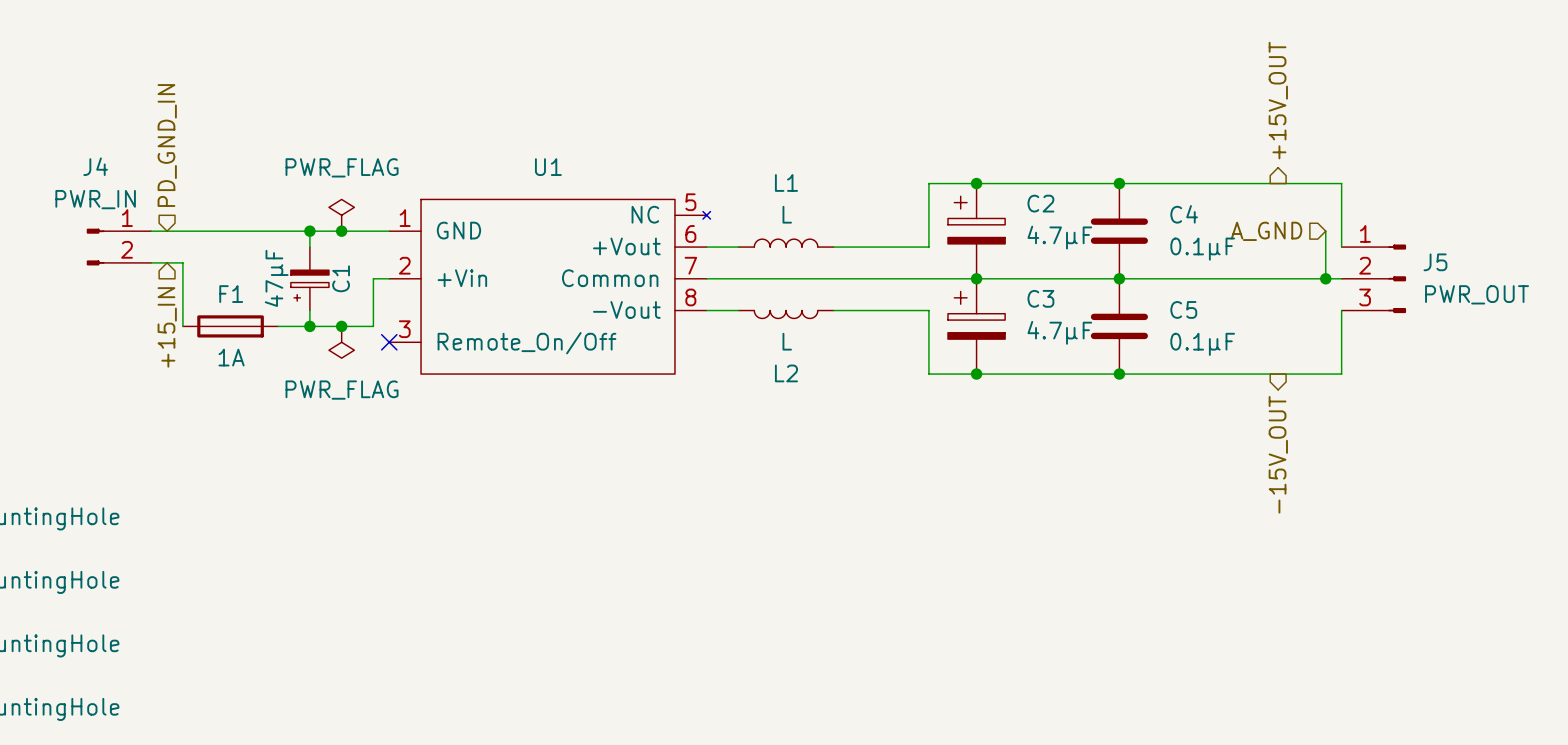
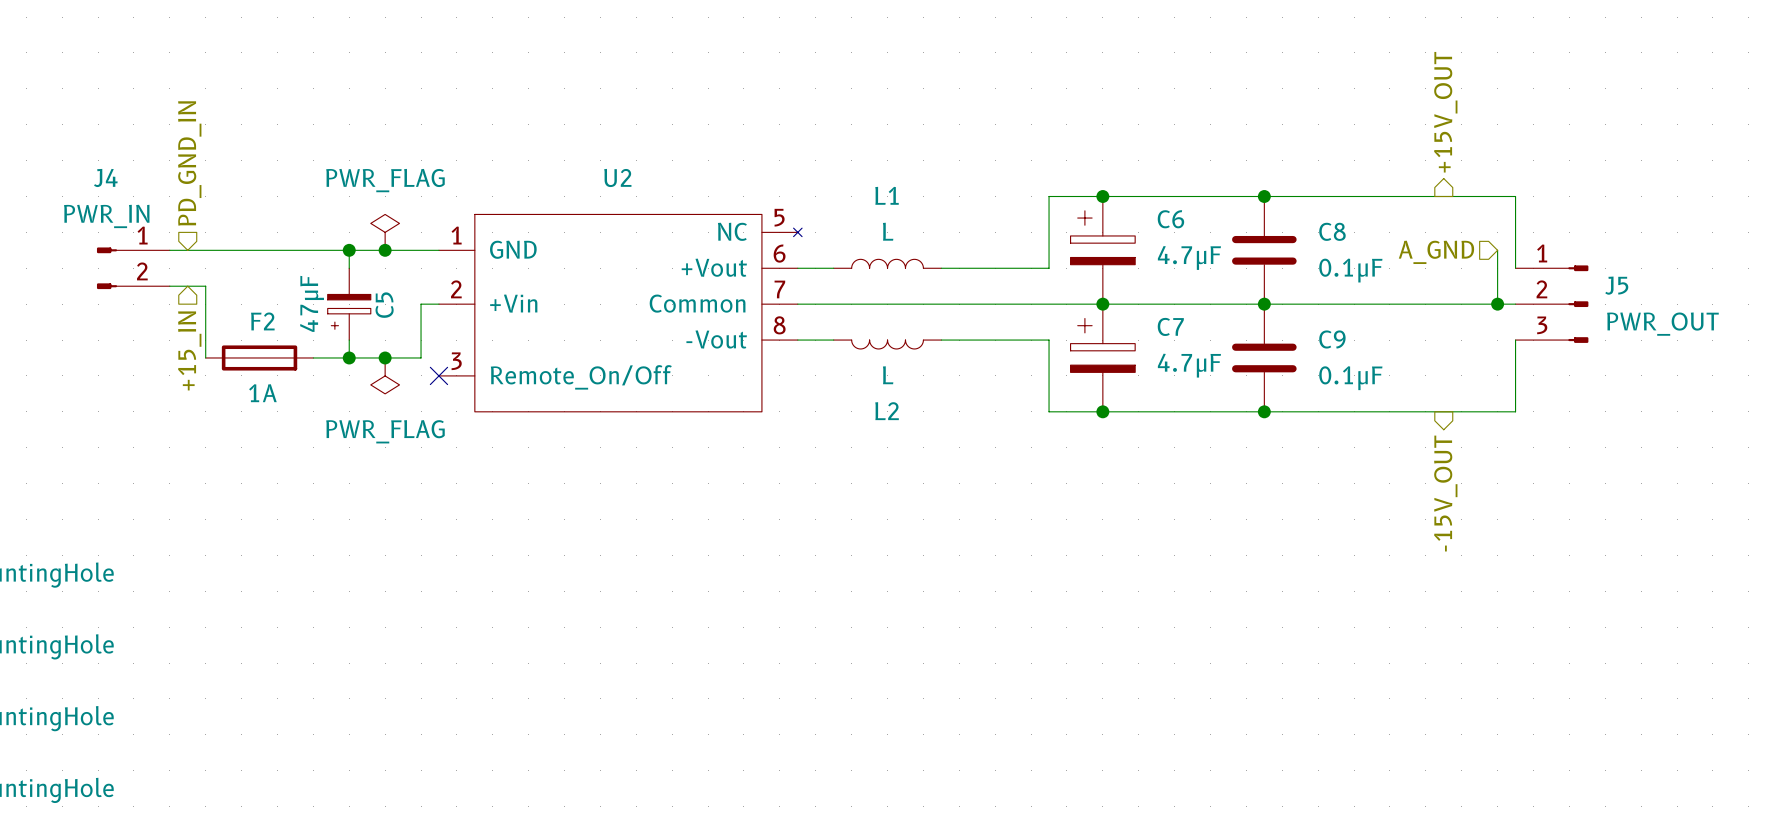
U1 name: U1 (548, 167) -> U2 (617, 177)
C2 name: C2 (1040, 203) -> C6 (1170, 219)
C4 name: C4 (1184, 214) -> C8 (1332, 231)
C1 name: C1 (341, 278) -> C5 (384, 305)
F1 name: F1 (231, 294) -> F2 (262, 321)
C3 name: C3 (1040, 298) -> C7 (1170, 326)
C5 name: C5 (1183, 309) -> C9 (1332, 339)

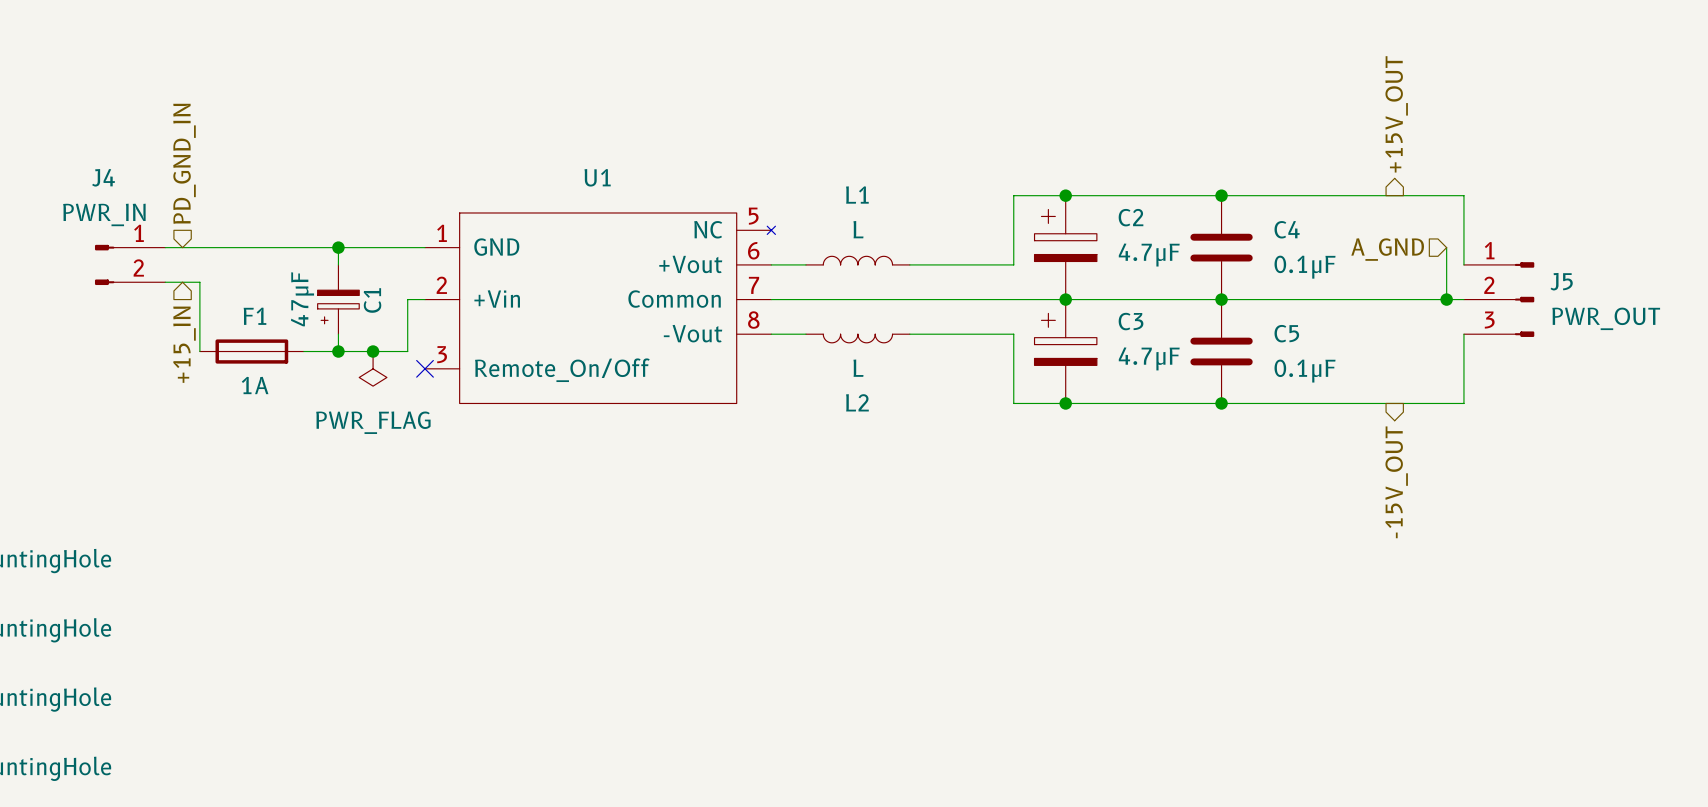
U2 name: U2 (617, 177) -> U1 (597, 177)
C6 name: C6 (1170, 219) -> C2 (1131, 217)
C8 name: C8 (1332, 231) -> C4 (1287, 229)
power symbol: PWR_FLAG (385, 232) -> none
junction: (385, 250) -> none
C5 name: C5 (384, 305) -> C1 (372, 300)
F2 name: F2 (262, 321) -> F1 (254, 316)
C7 name: C7 (1170, 326) -> C3 (1131, 321)
C9 name: C9 (1332, 339) -> C5 (1286, 333)

